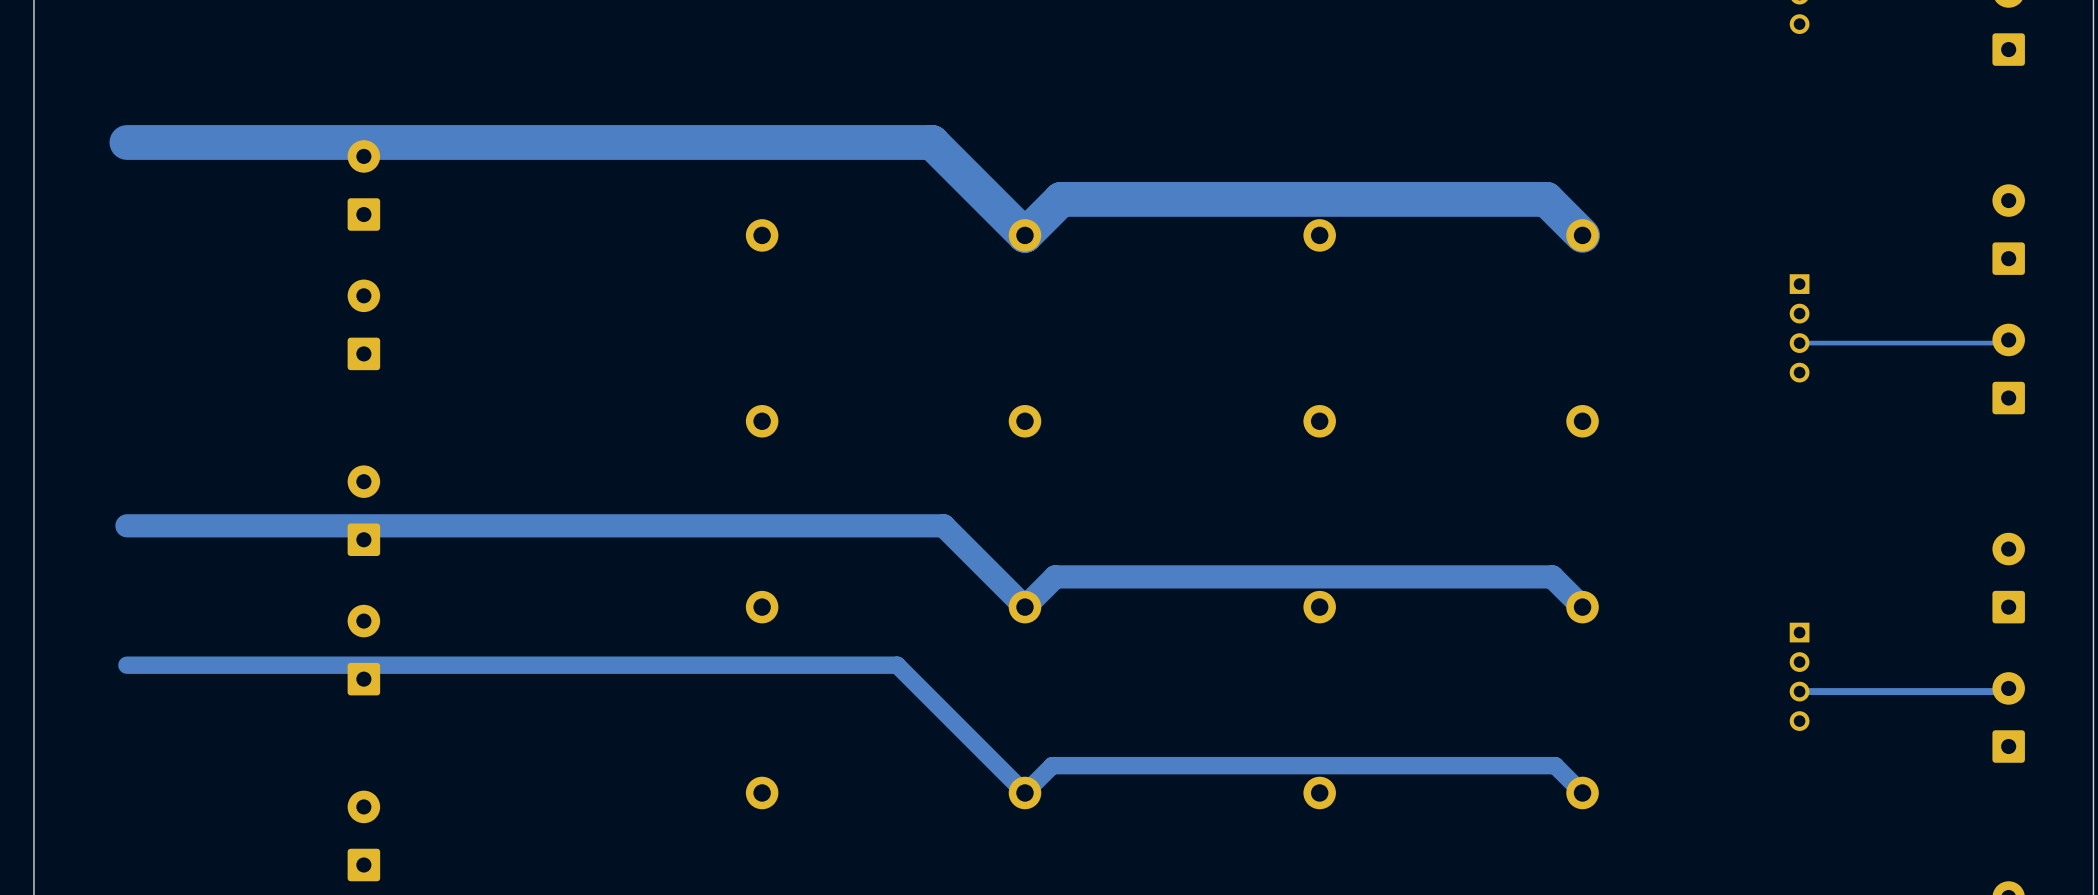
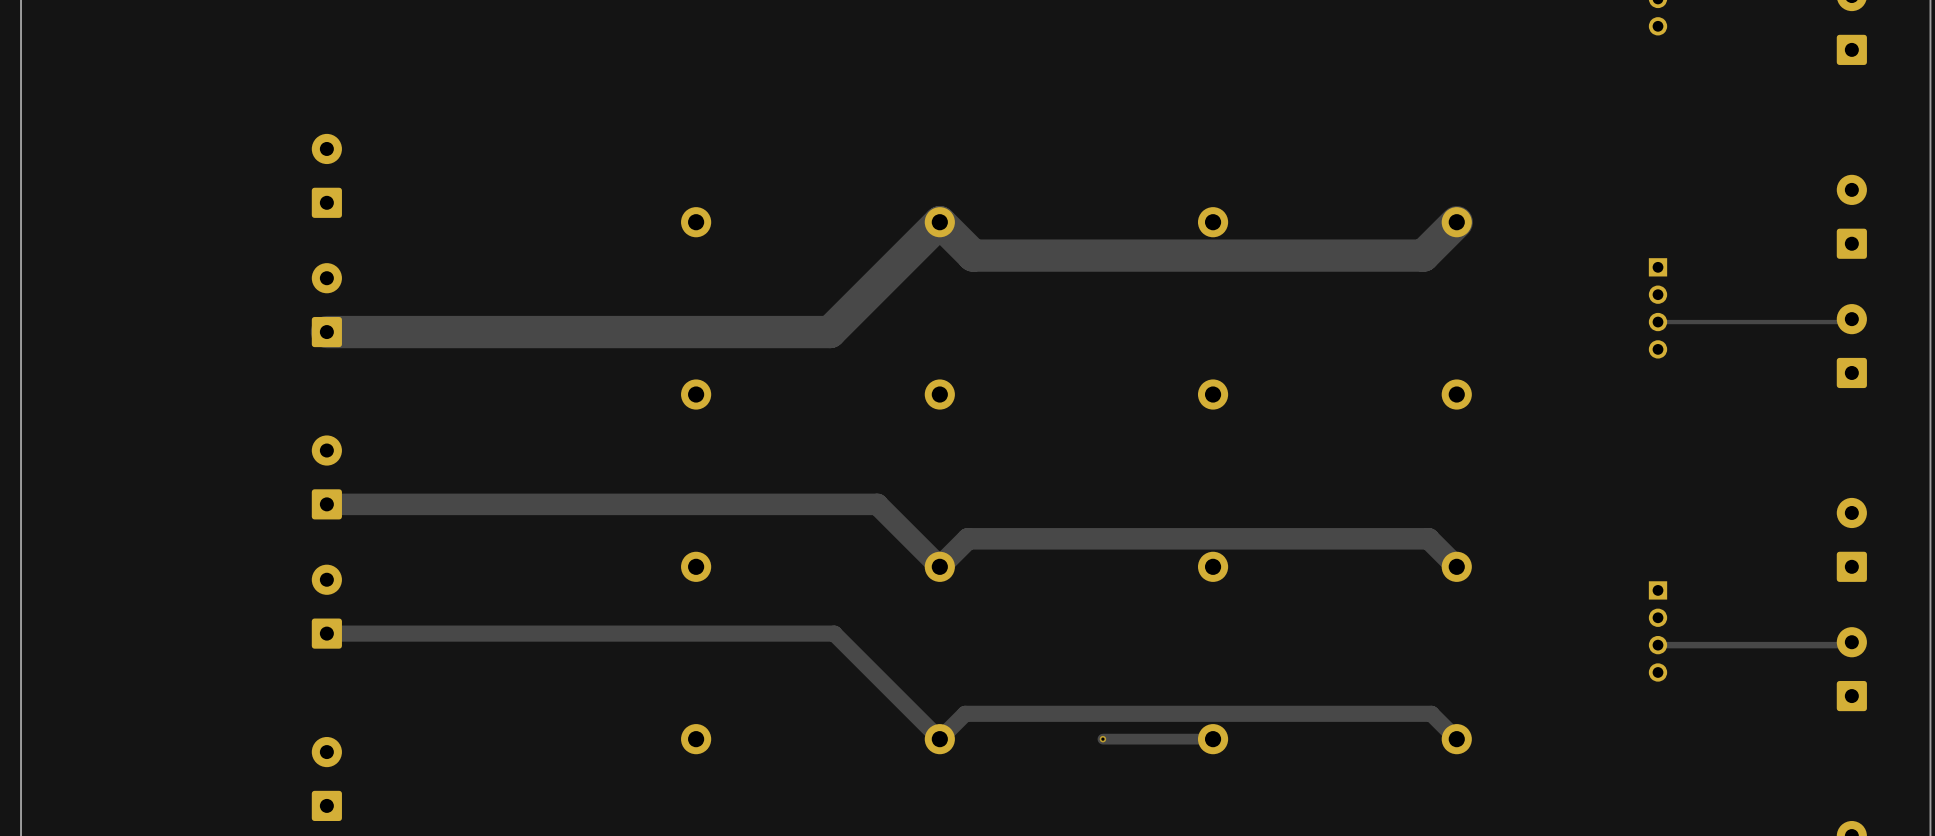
track: (126, 142) (932, 142) (1024, 235) (1061, 199) (1546, 199) (1582, 235) -> (326, 332) (829, 332) (939, 222) (973, 255) (1423, 255) (1456, 222)
track: (126, 525) (943, 525) (957, 539) -> (326, 504) (877, 504)
track: (126, 665) (897, 665) (911, 679) -> (326, 633) (834, 633)
via: none -> (1102, 739)
track: none -> (1213, 739) (1102, 739)

